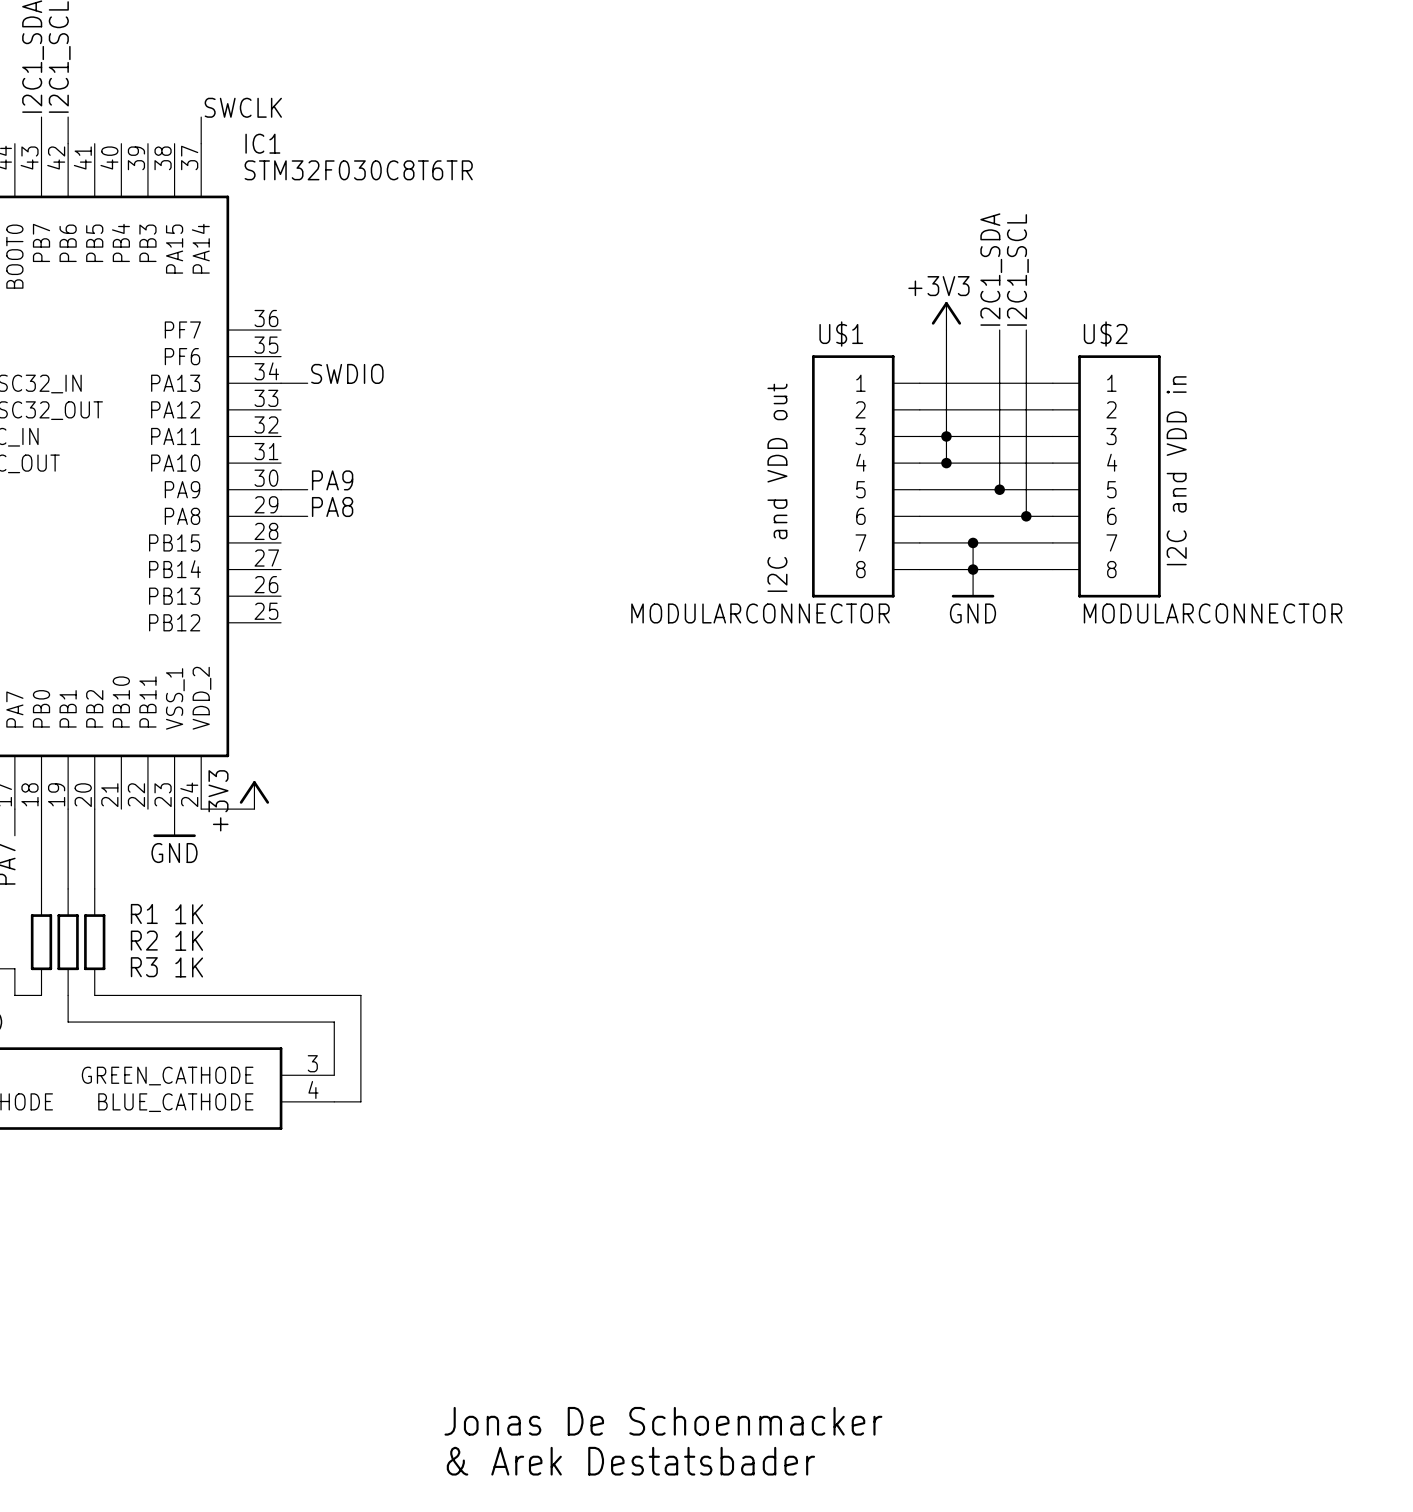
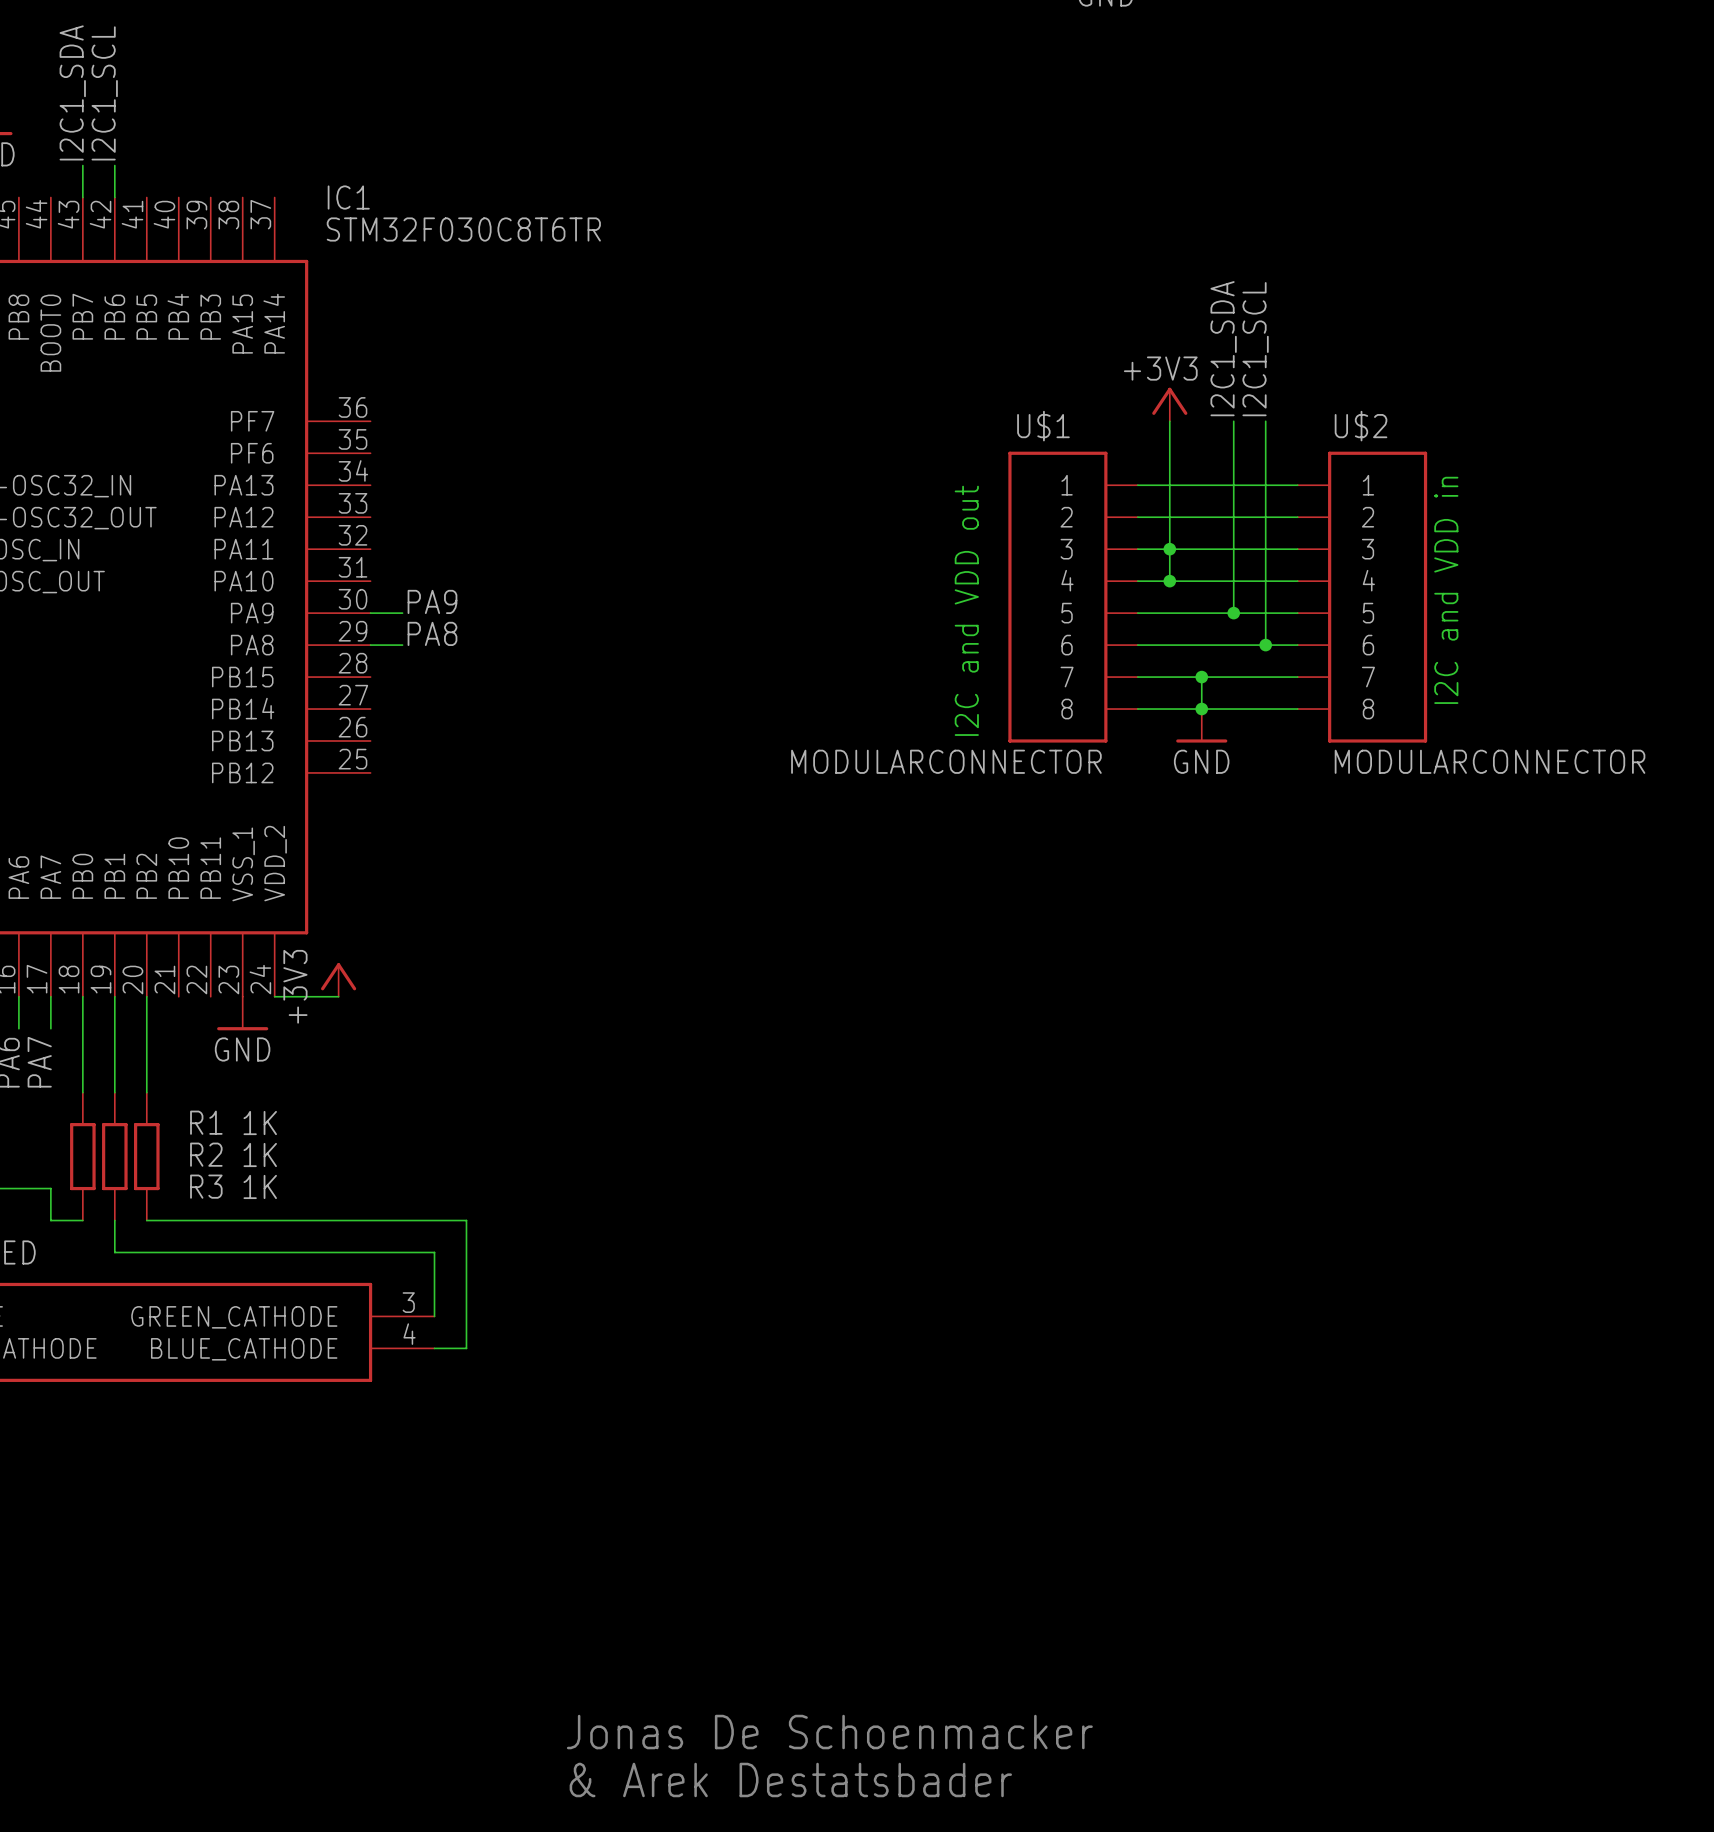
label: SWCLK (243, 107) -> none
wire: (201, 117) (201, 143) -> none
label: SWDIO (347, 373) -> none
wire: (281, 383) (307, 383) -> none

